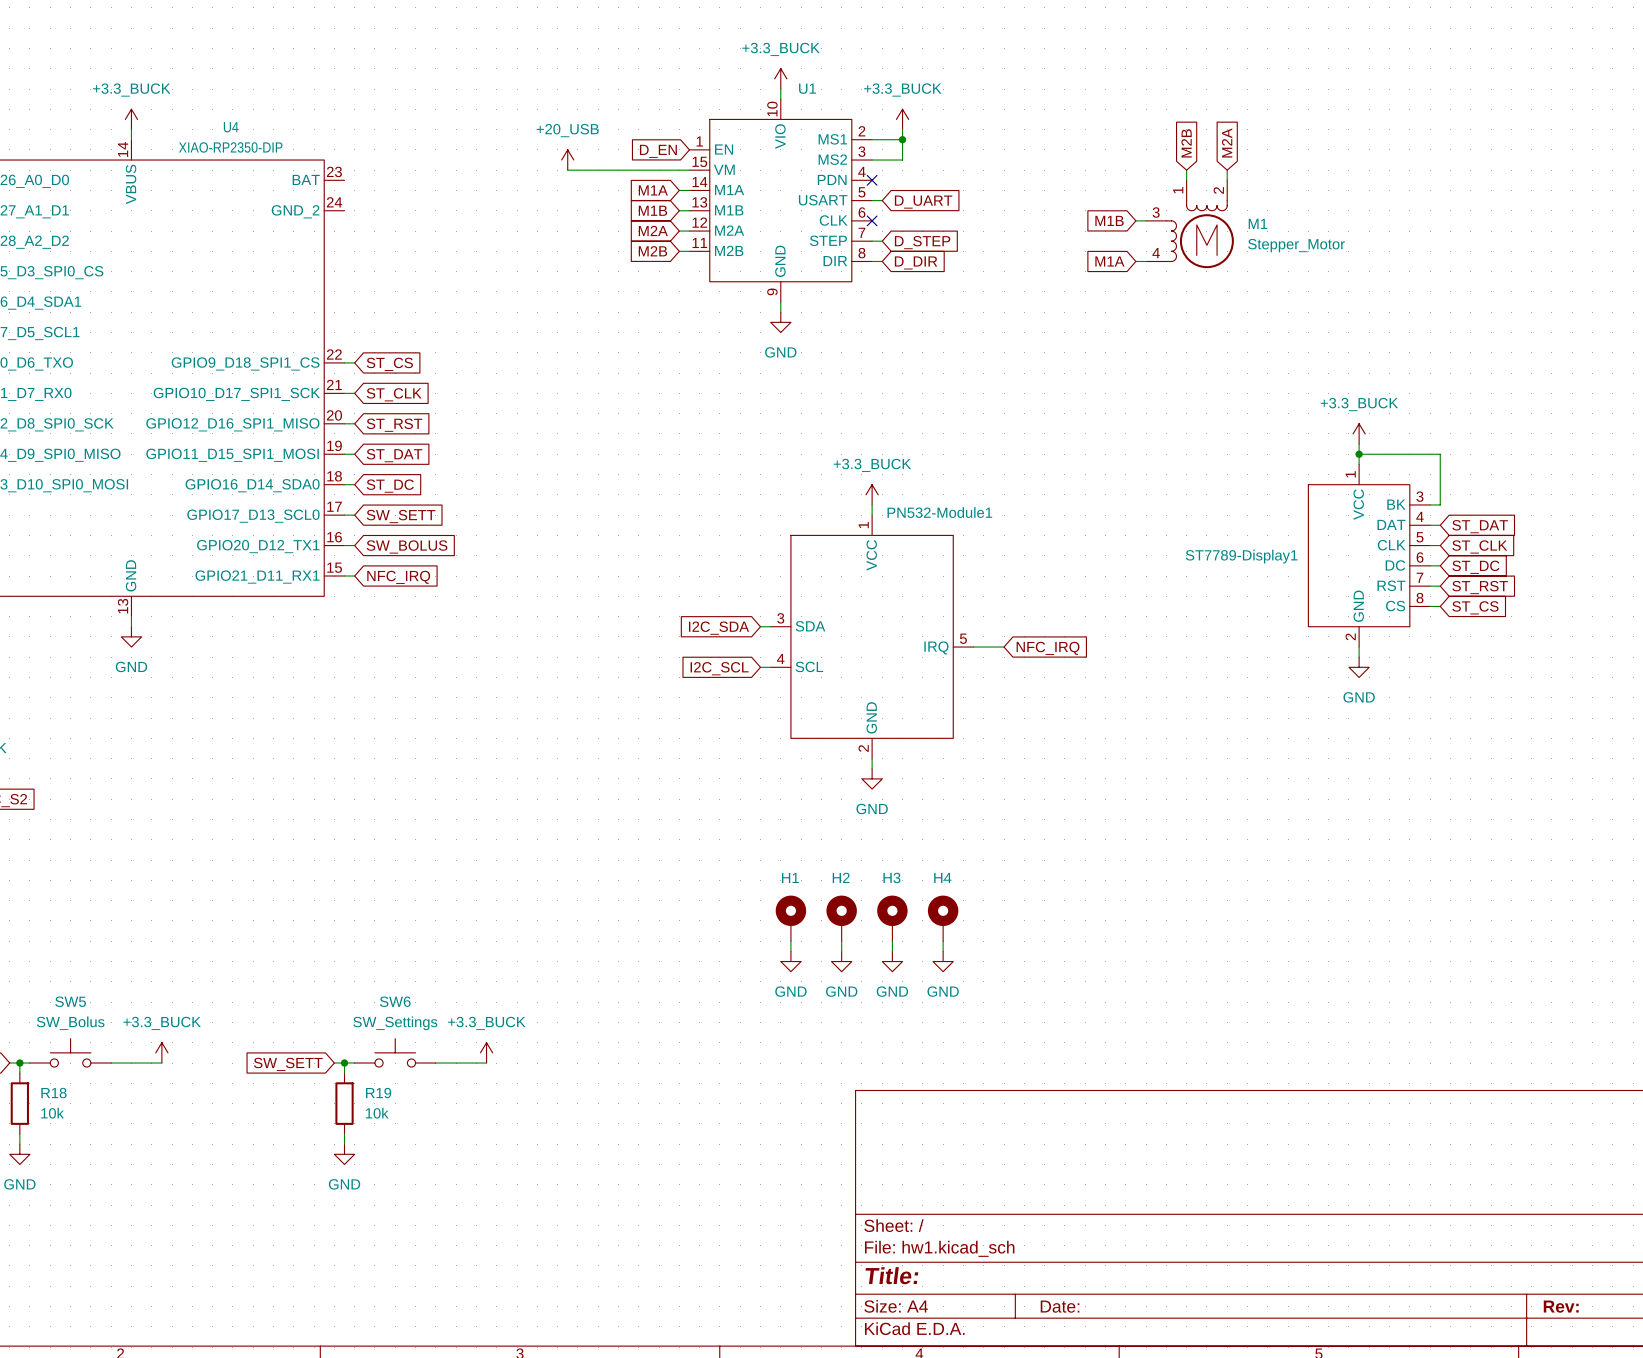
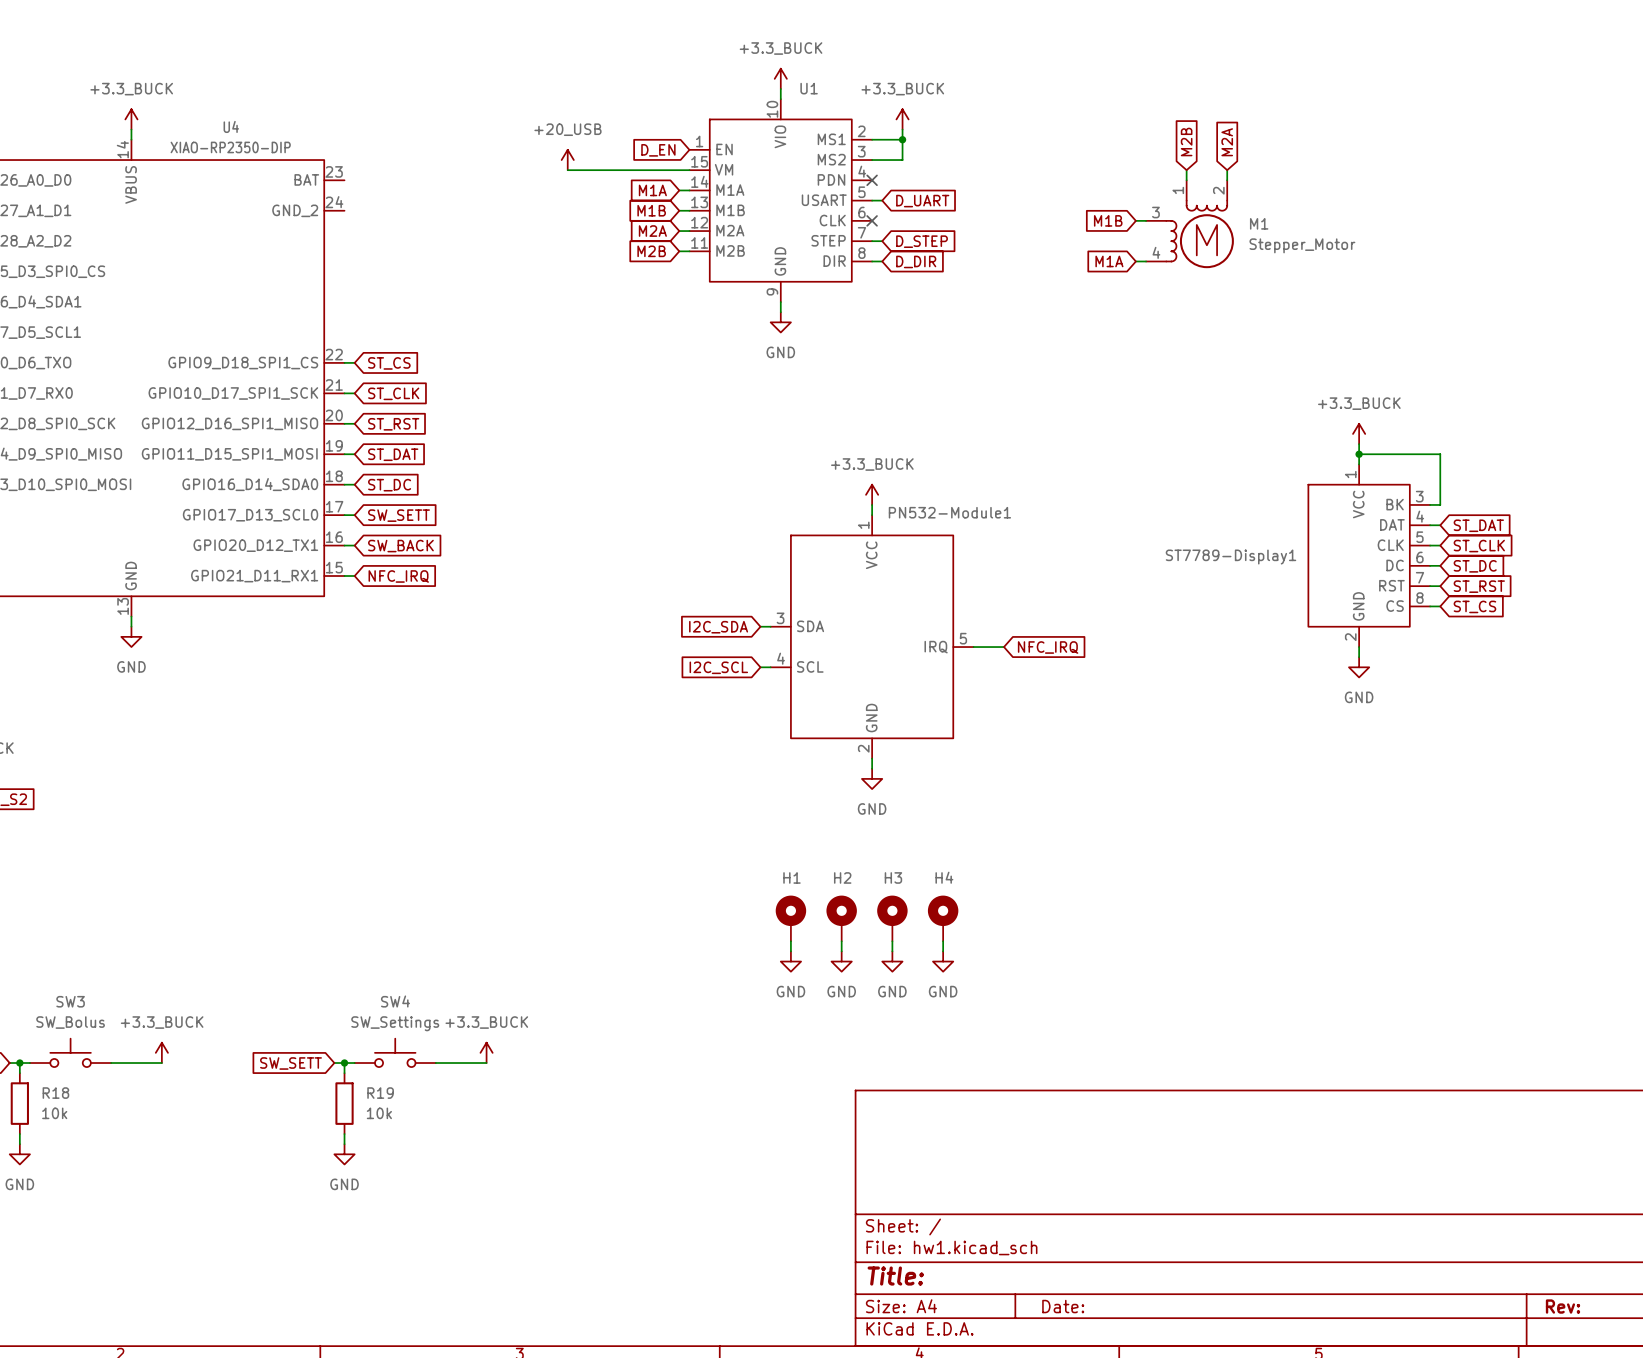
global label: SW_BOLUS (407, 546) -> SW_BACK (400, 546)
SW5 name: SW5 (70, 1001) -> SW3 (70, 1001)
SW6 name: SW6 (395, 1001) -> SW4 (395, 1001)

